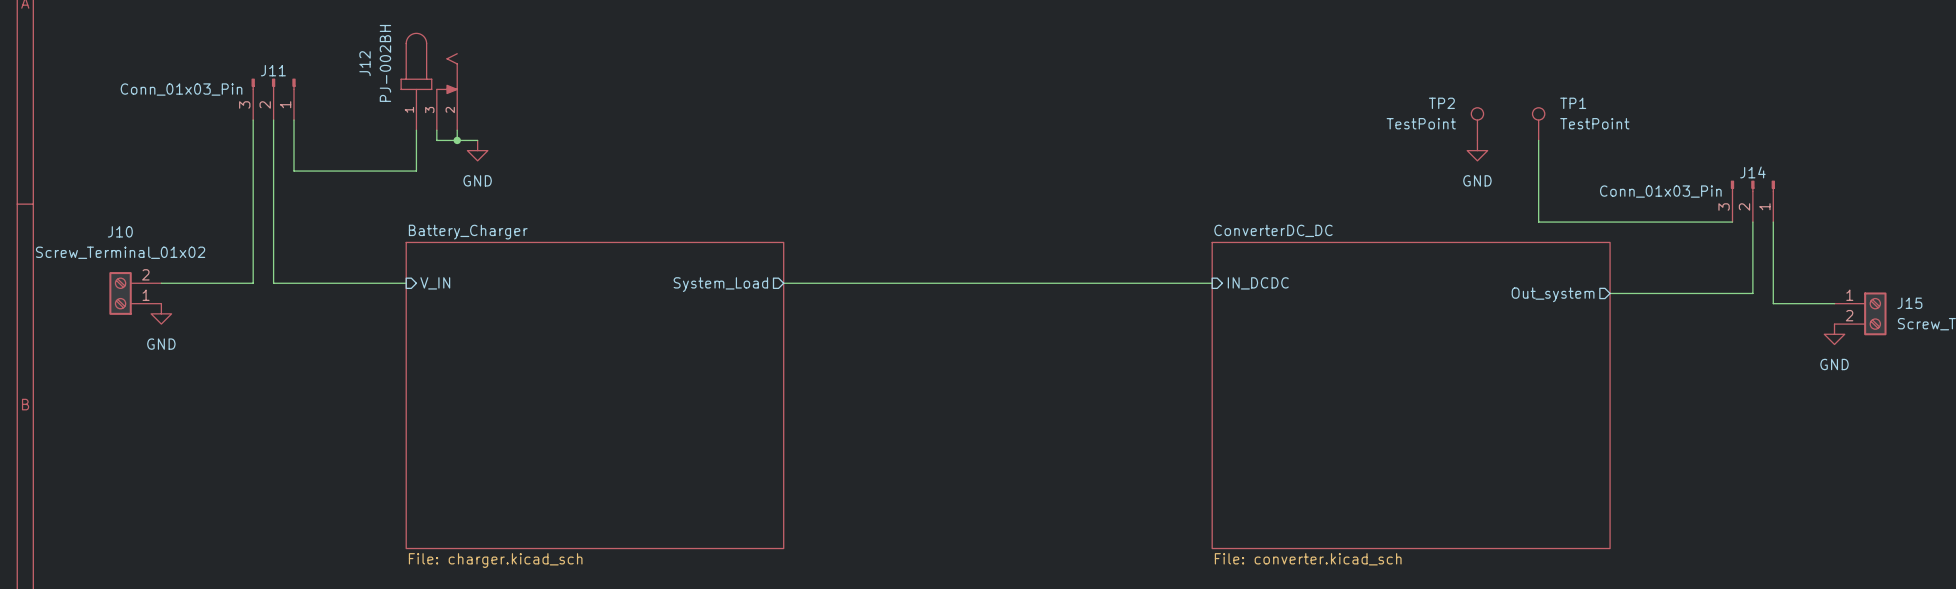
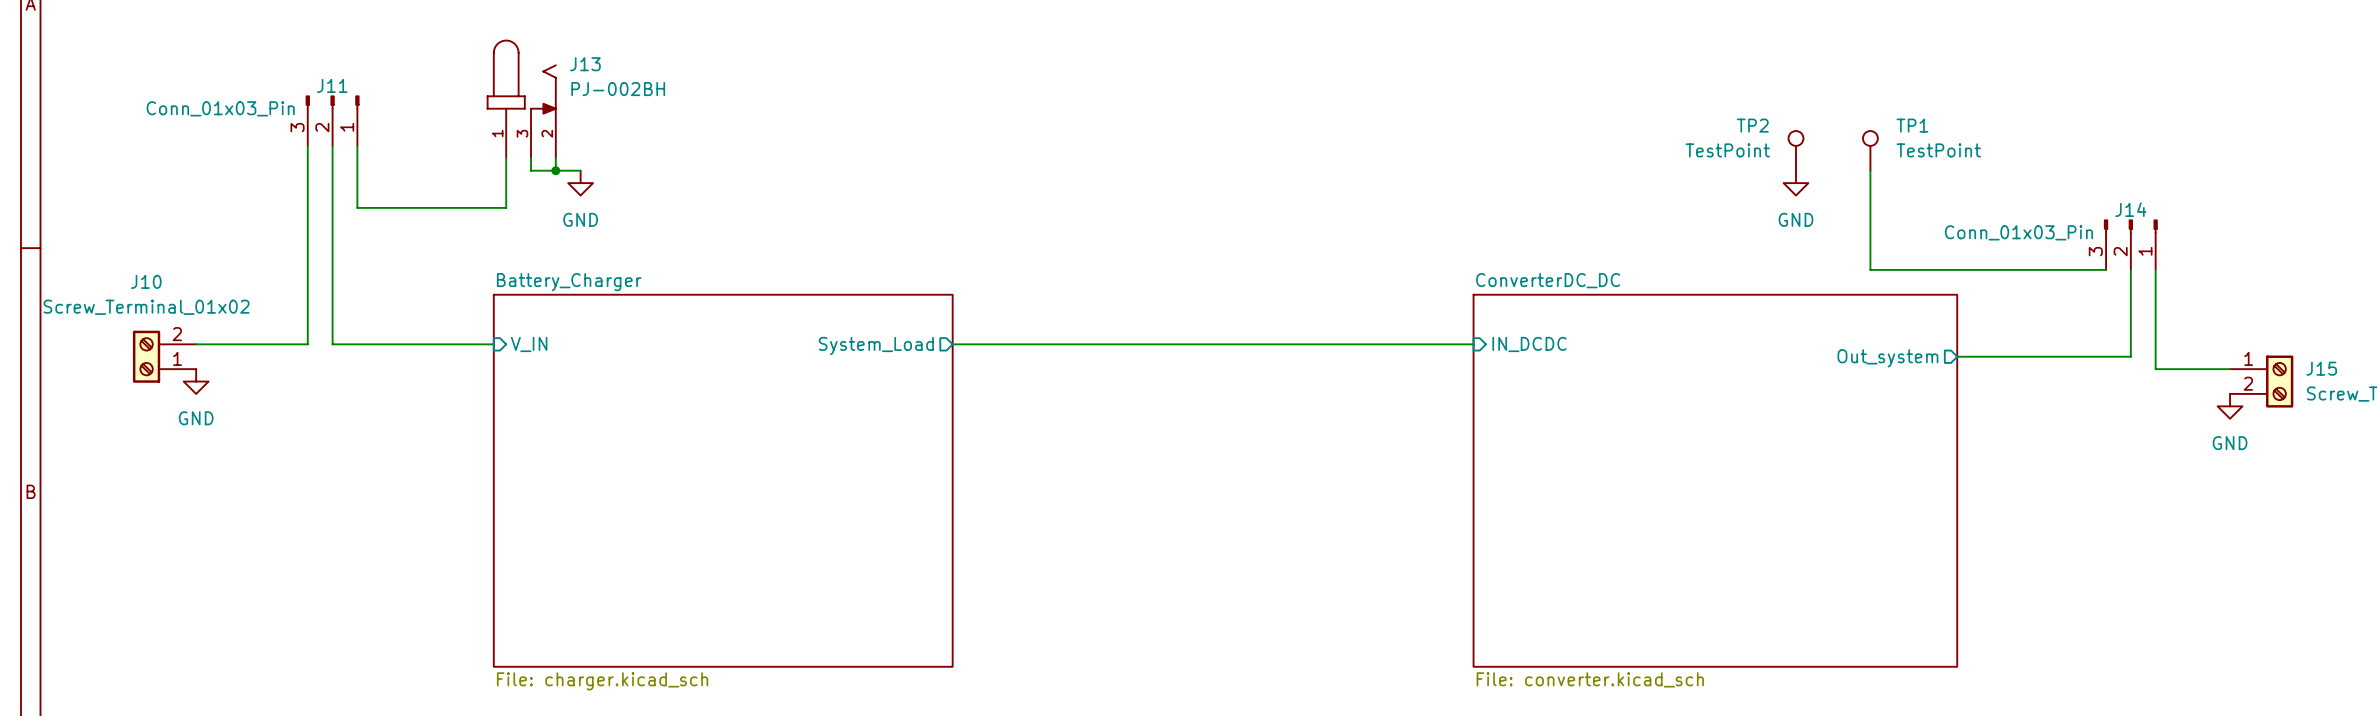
J12 name: J12 (365, 63) -> J13 (585, 64)
J12 value rotation: 0° (385, 63) -> 90° clockwise (618, 89)
J12 value position: PJ-002BH (385, 63) -> PJ-002BH (618, 89)

